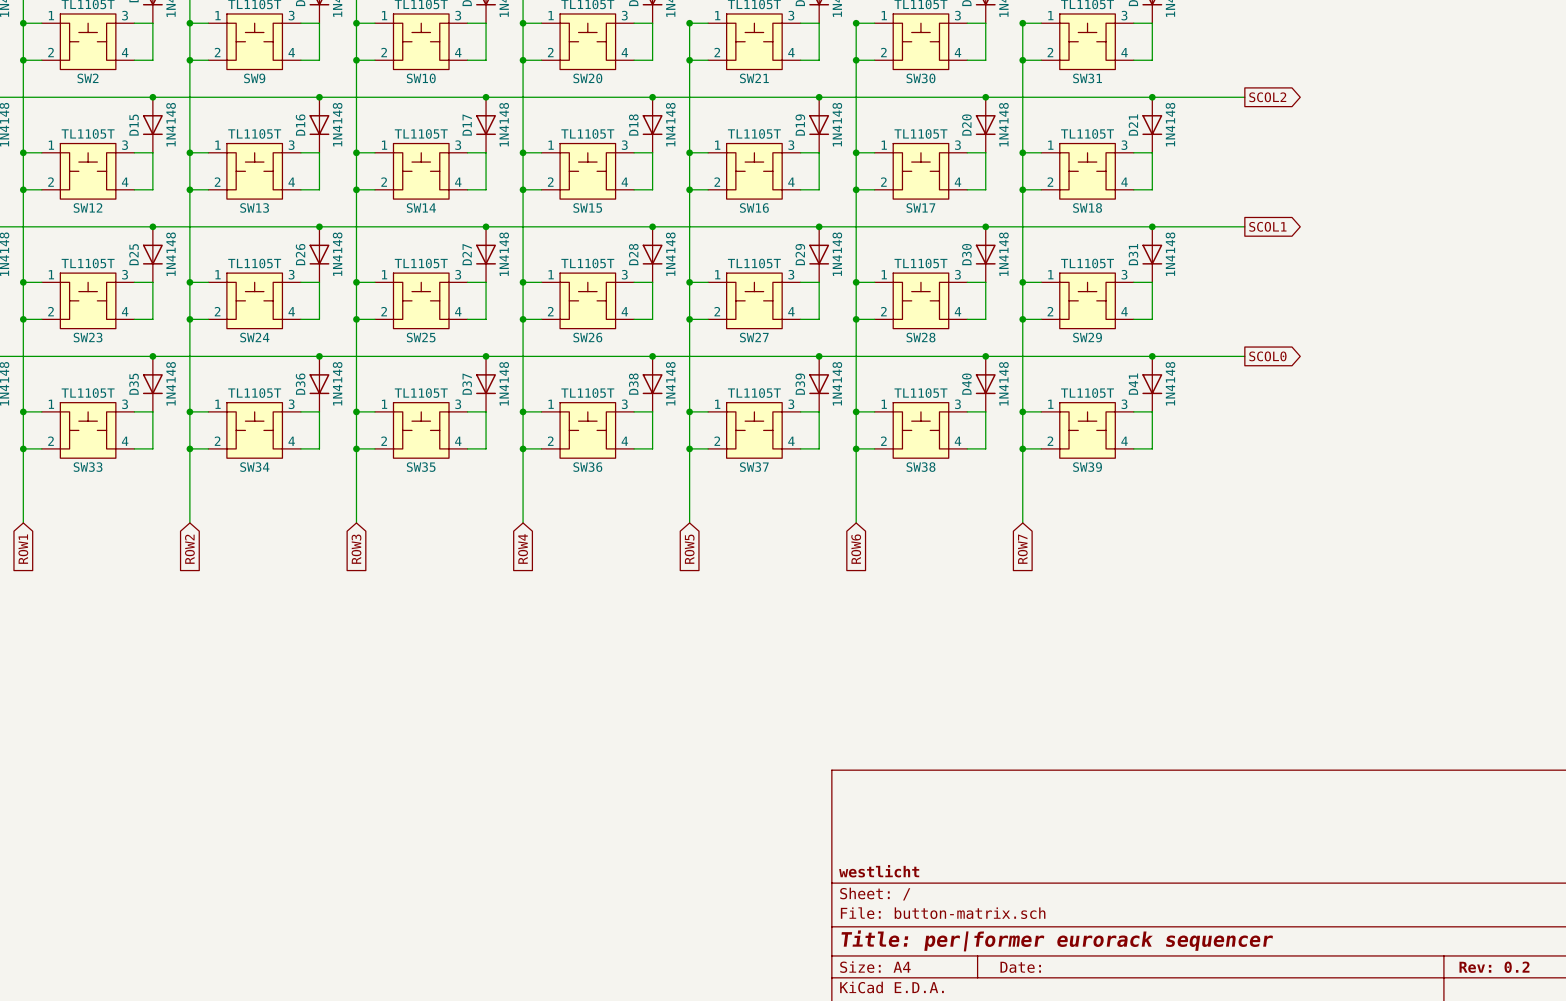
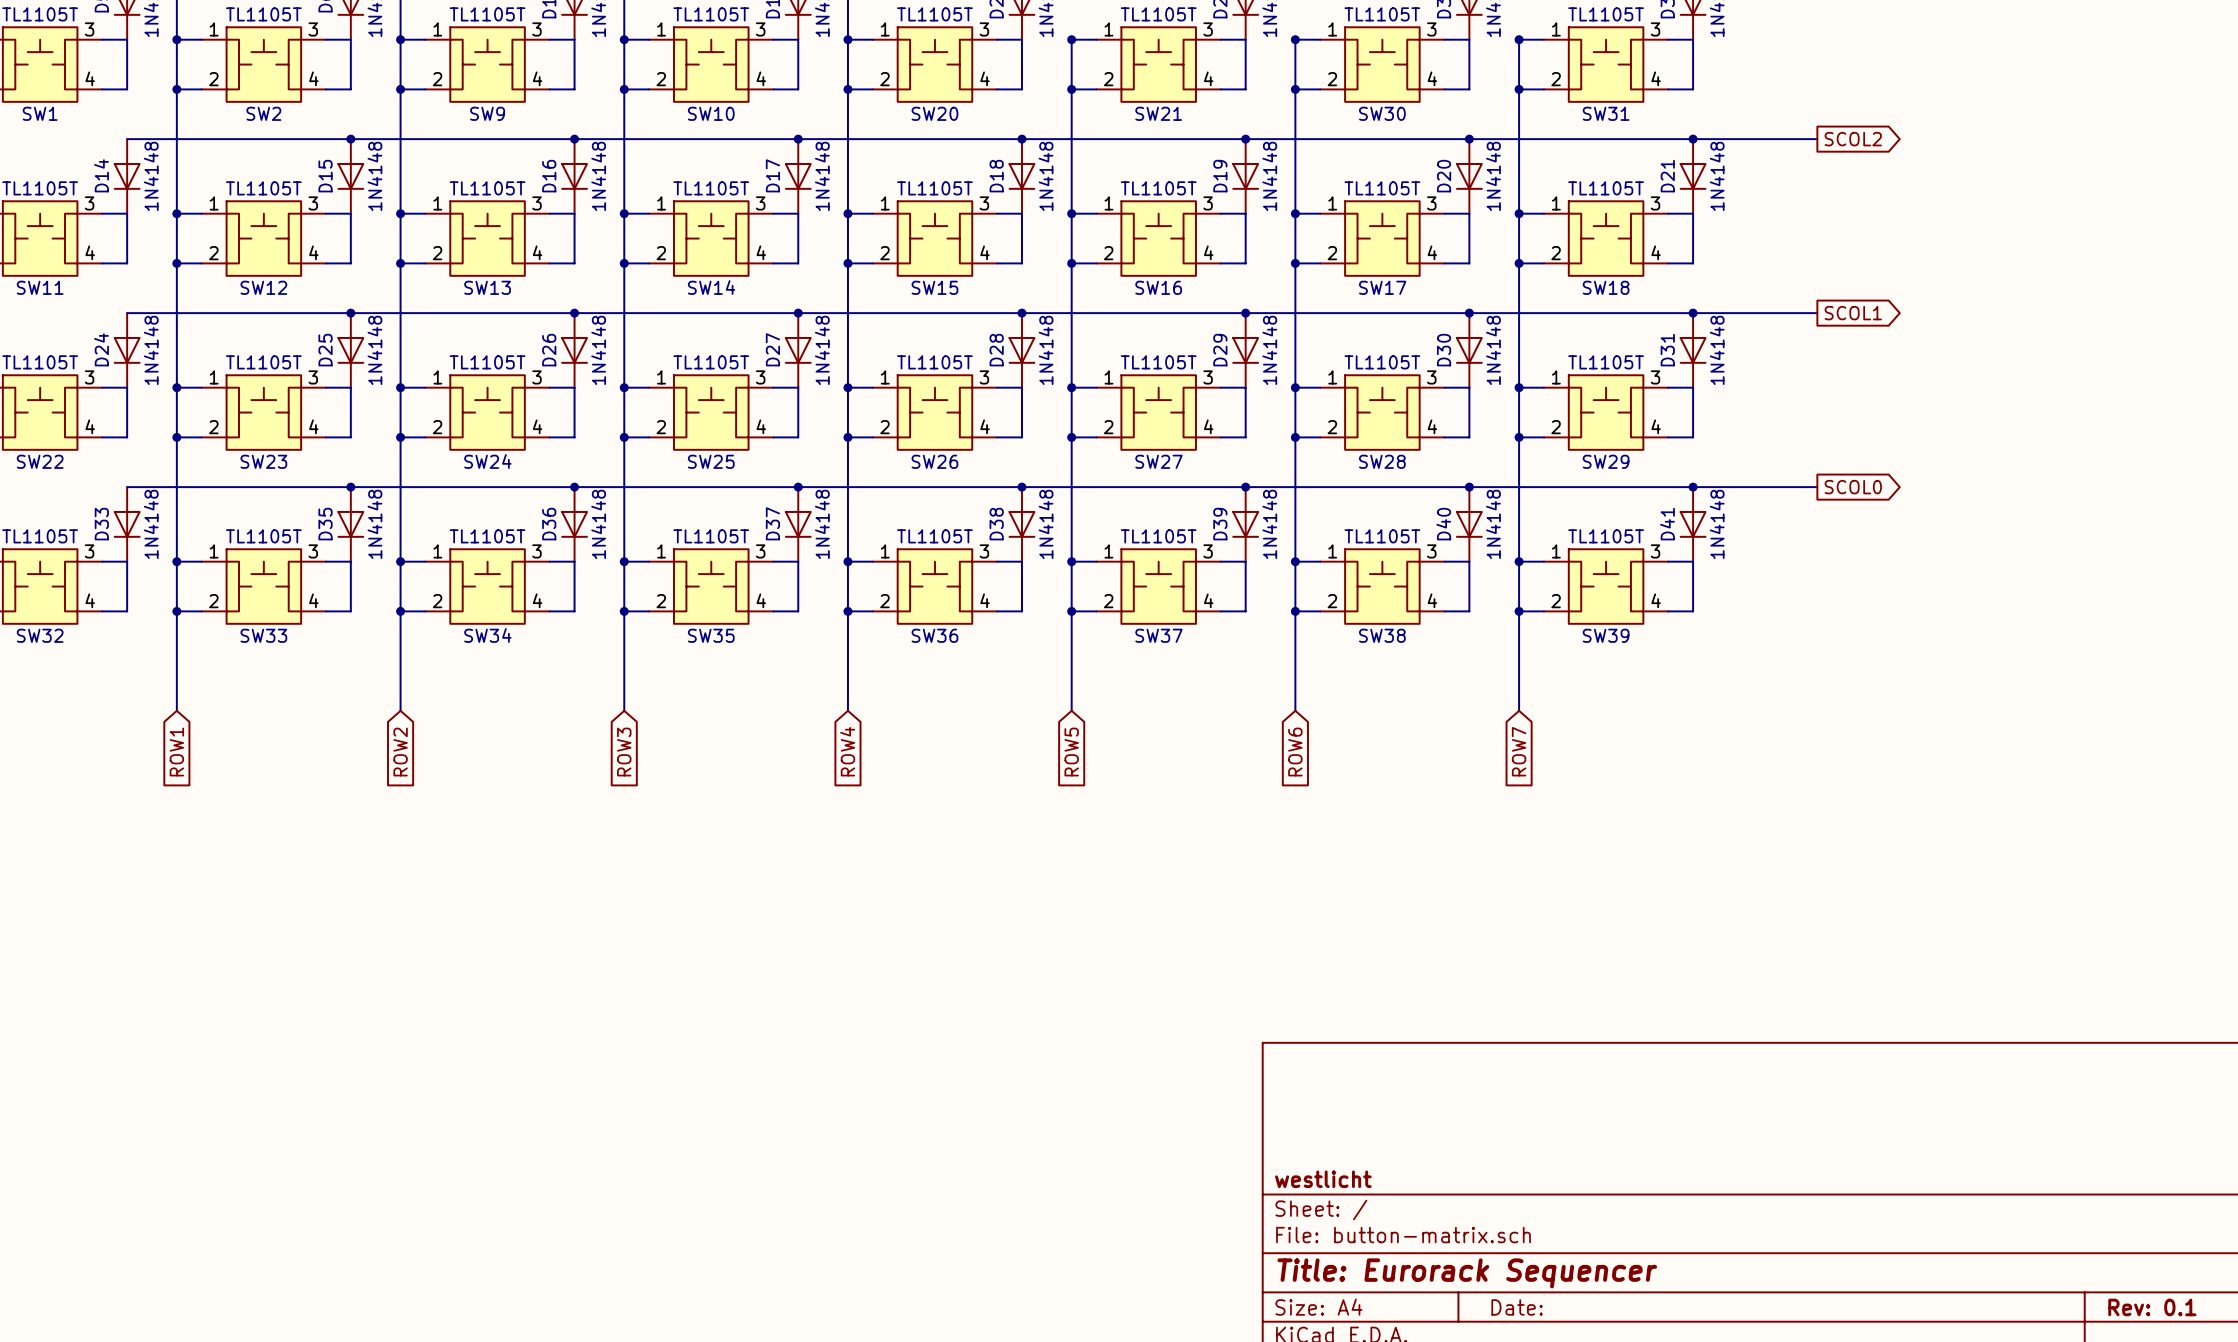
title block: Title: per|former eurorack sequencer (1057, 940) -> Title: Eurorack Sequencer (1467, 1273)
title block: Rev: 0.2 (1494, 967) -> Rev: 0.1 (2152, 1307)

